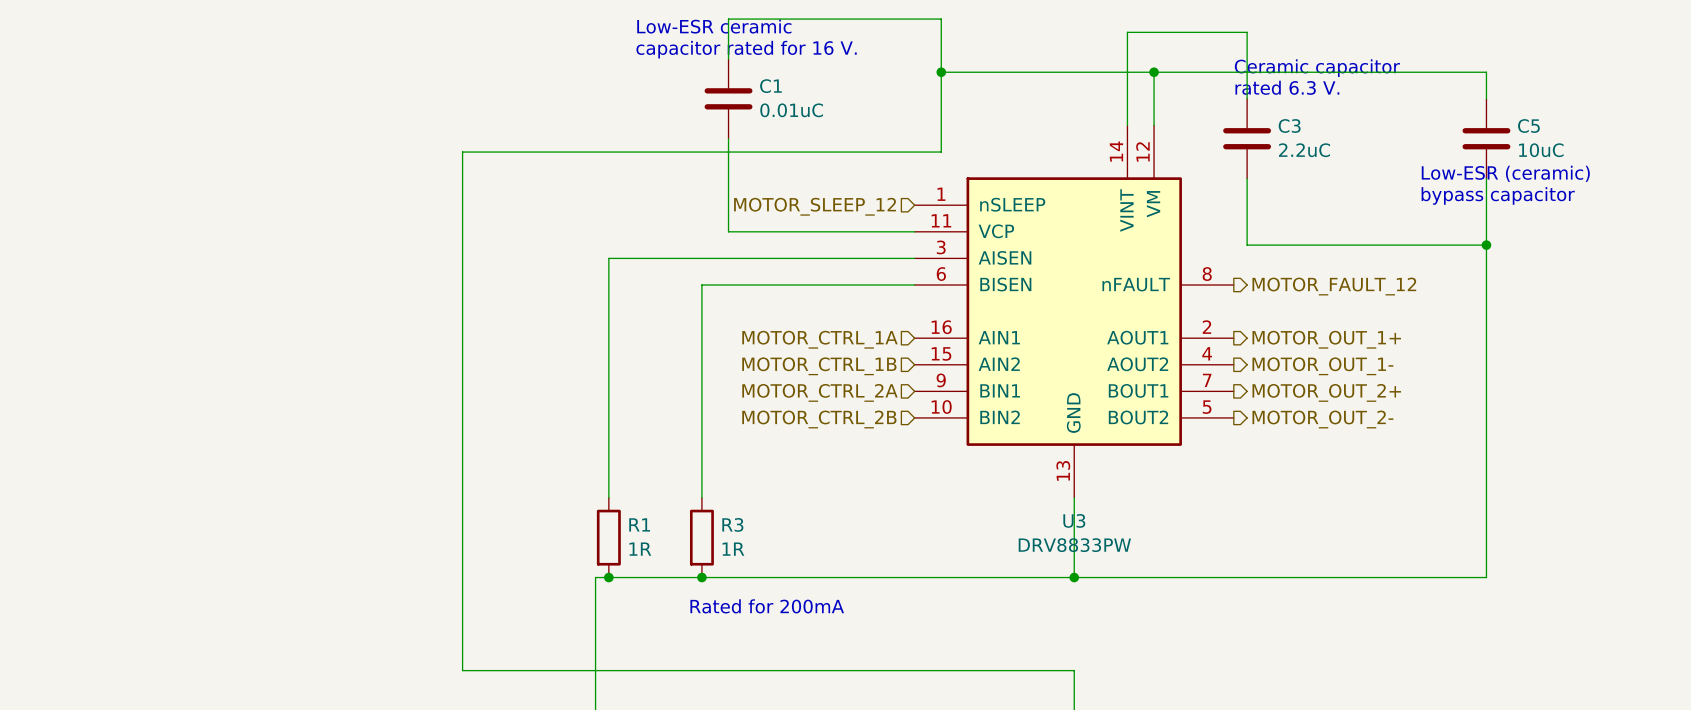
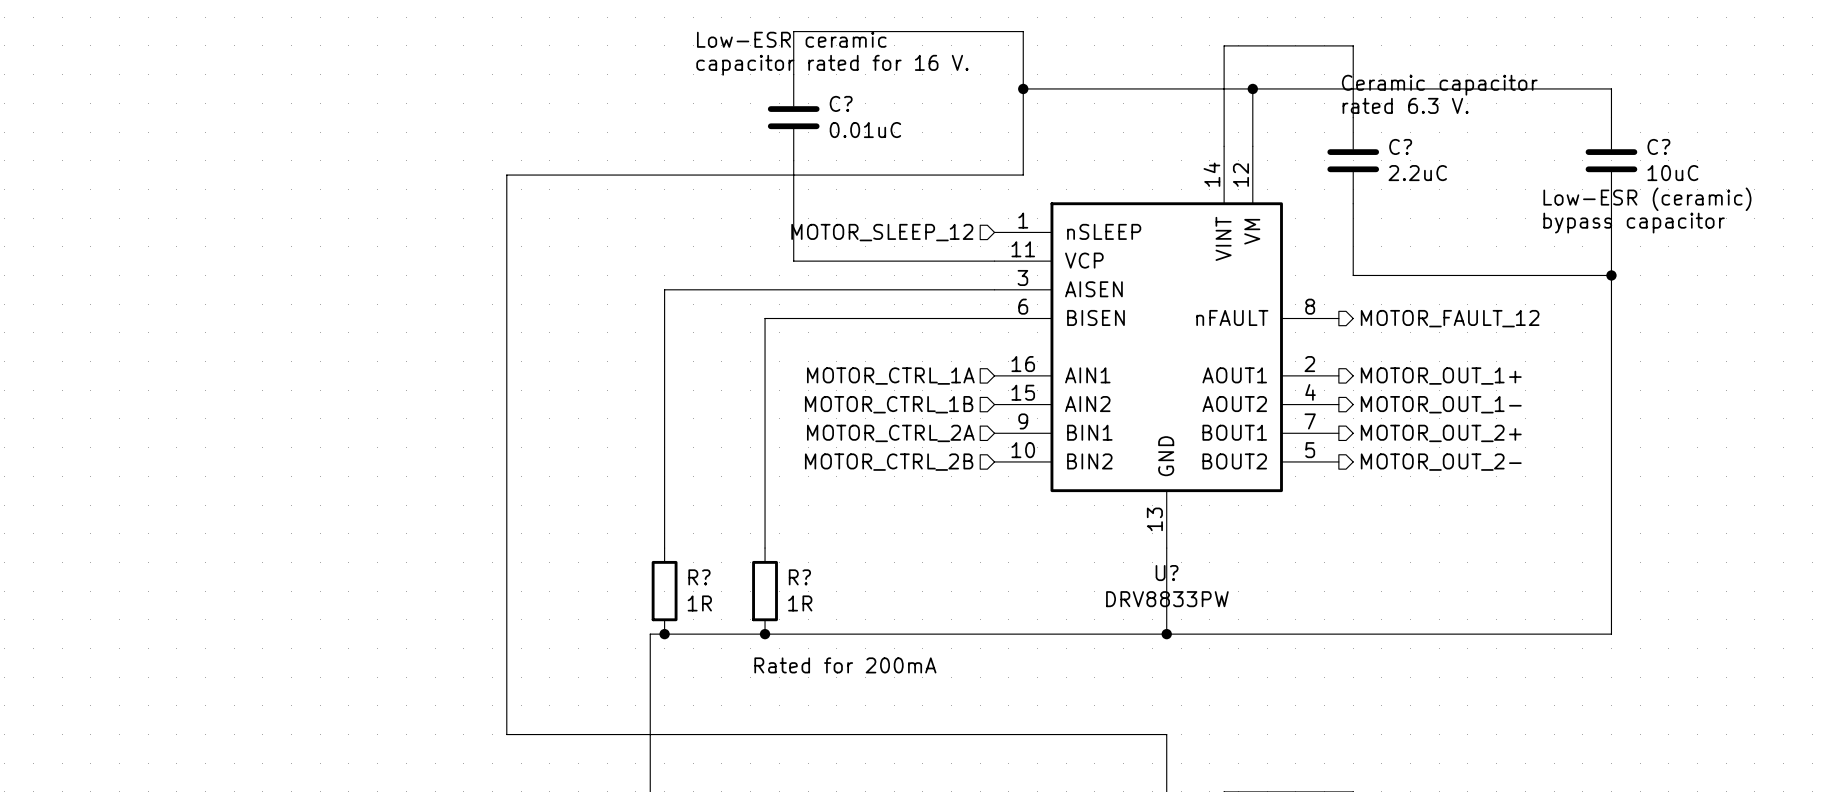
C1 name: C1 (770, 86) -> C? (841, 103)
C3 name: C3 (1289, 126) -> C? (1400, 146)
C5 name: C5 (1528, 126) -> C? (1658, 146)
U3 name: U3 (1074, 520) -> U? (1167, 573)
R1 name: R1 (639, 524) -> R? (699, 577)
R3 name: R3 (732, 524) -> R? (799, 577)

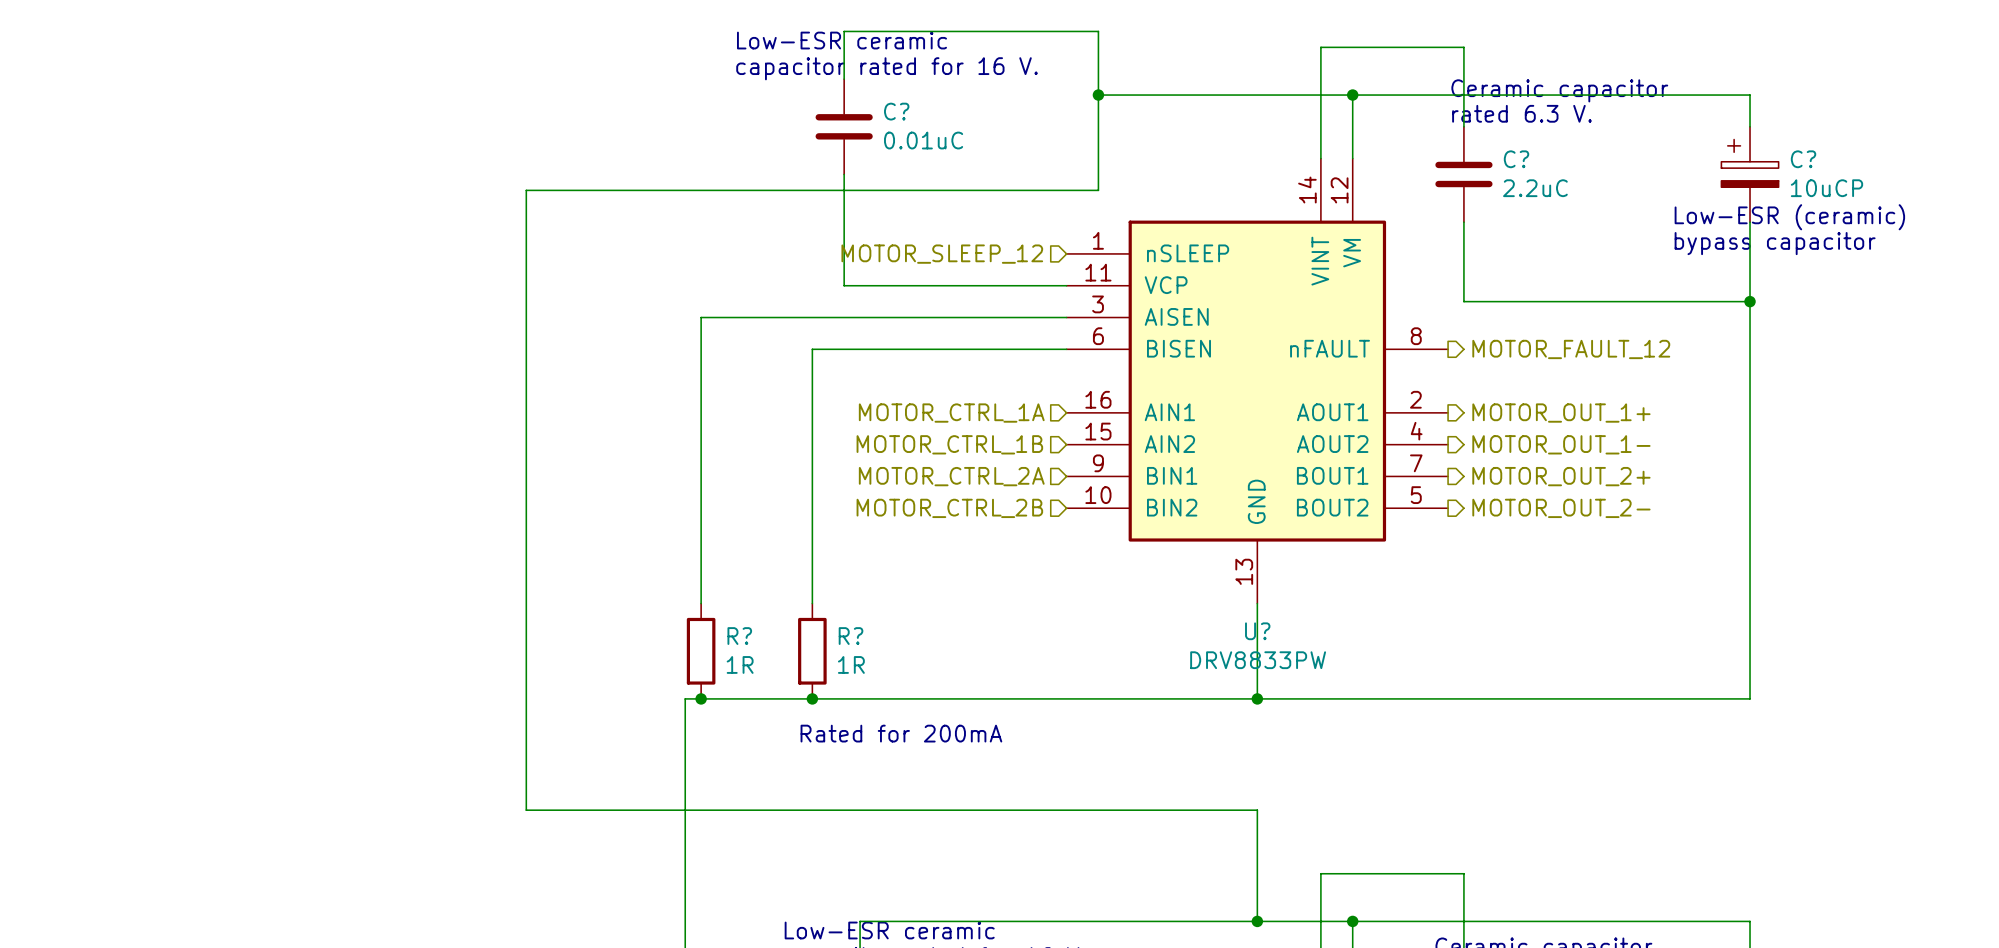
C? symbol: [1585, 117, 1638, 204] -> [1721, 126, 1779, 223]
C? value: 10uC (1672, 173) -> 10uCP (1826, 188)

